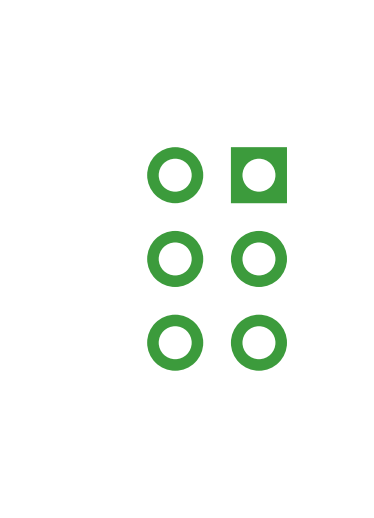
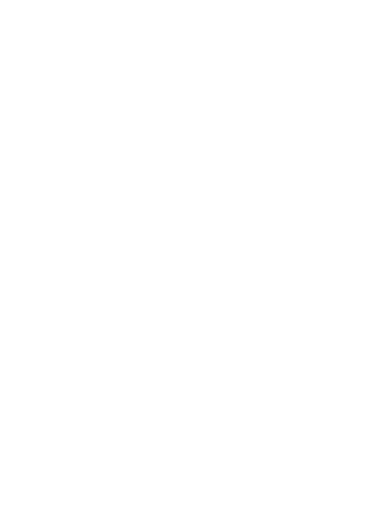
part: (217, 258) -> none

